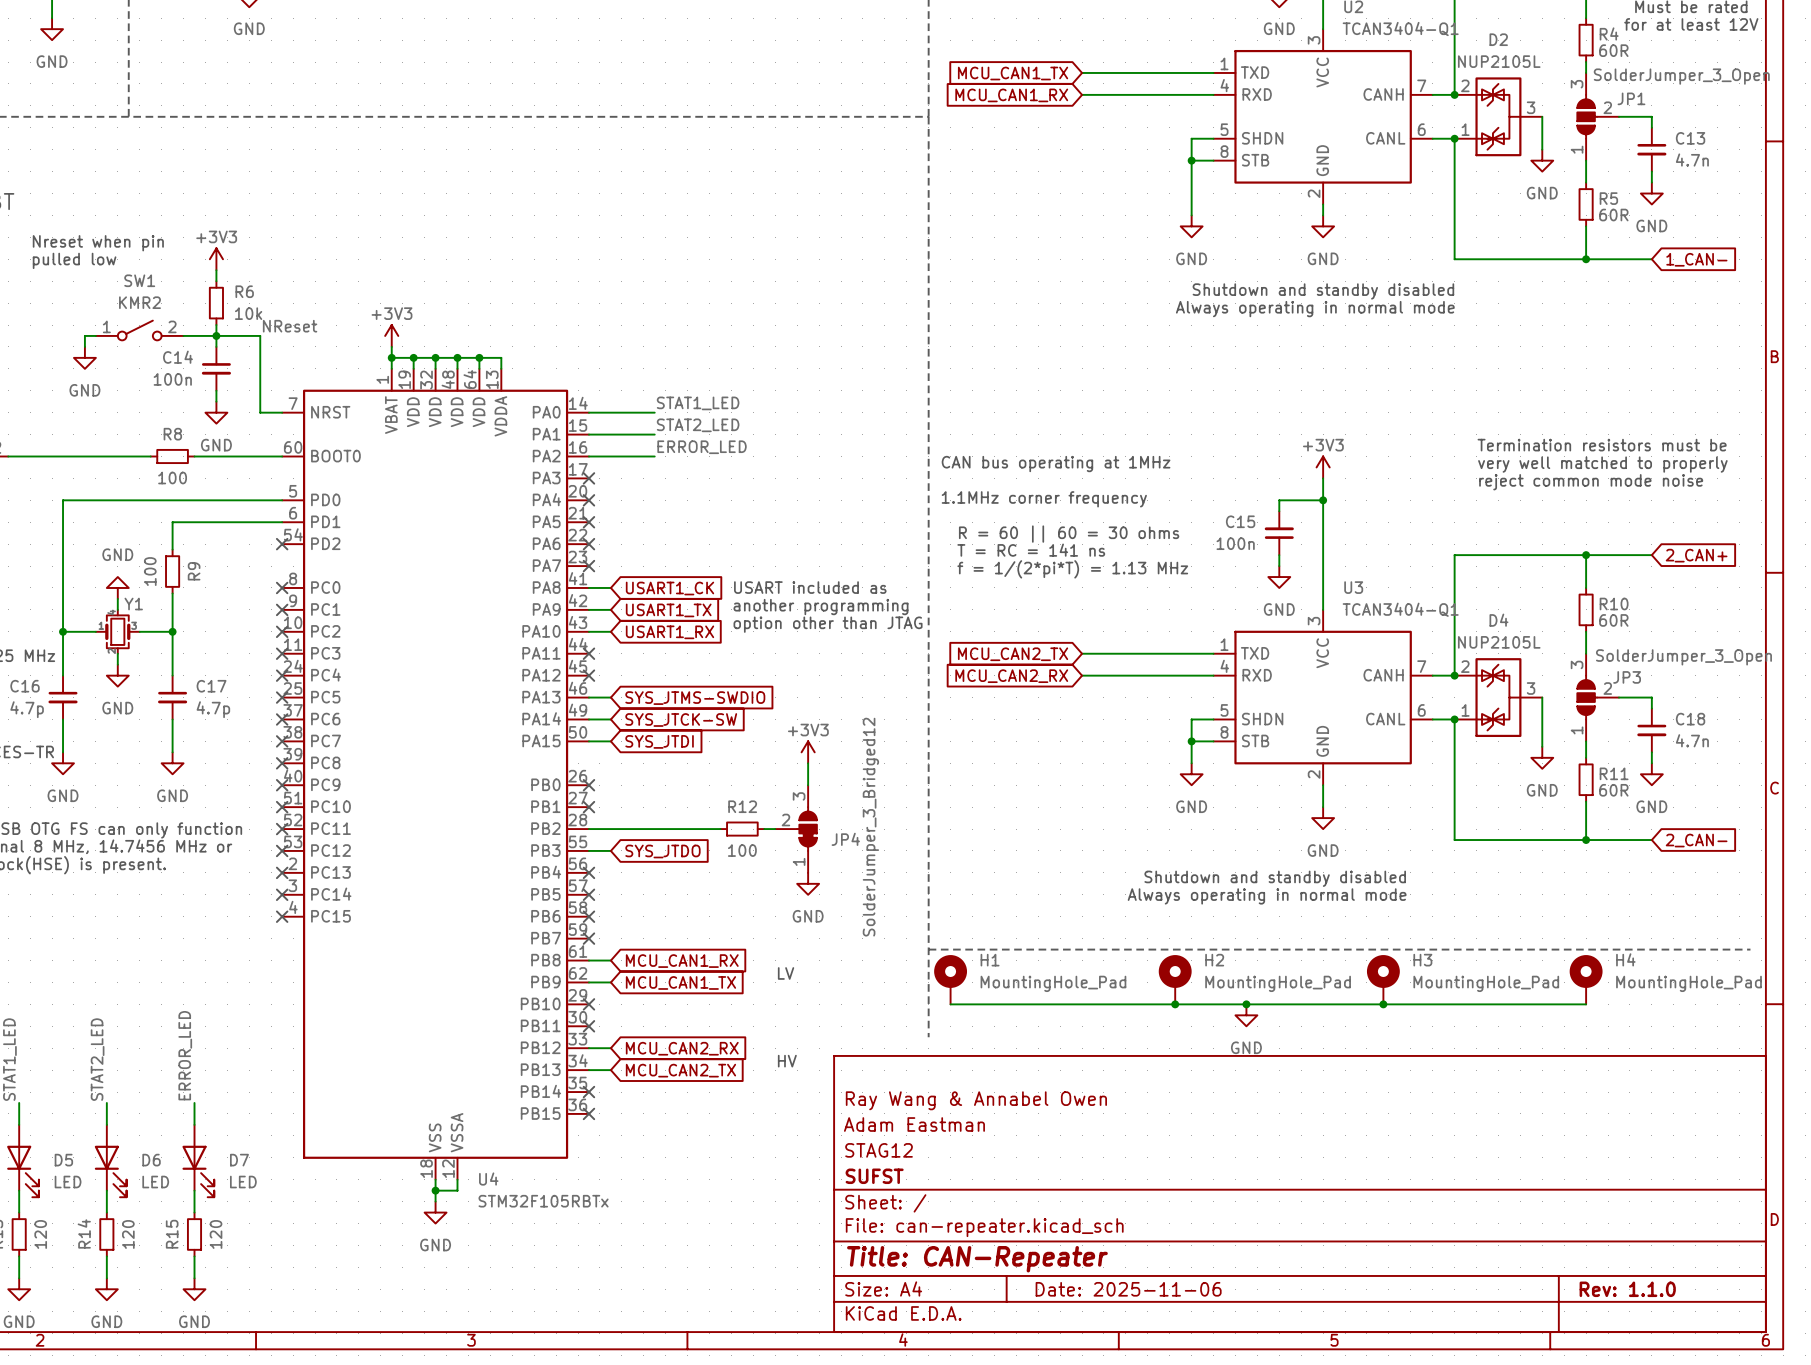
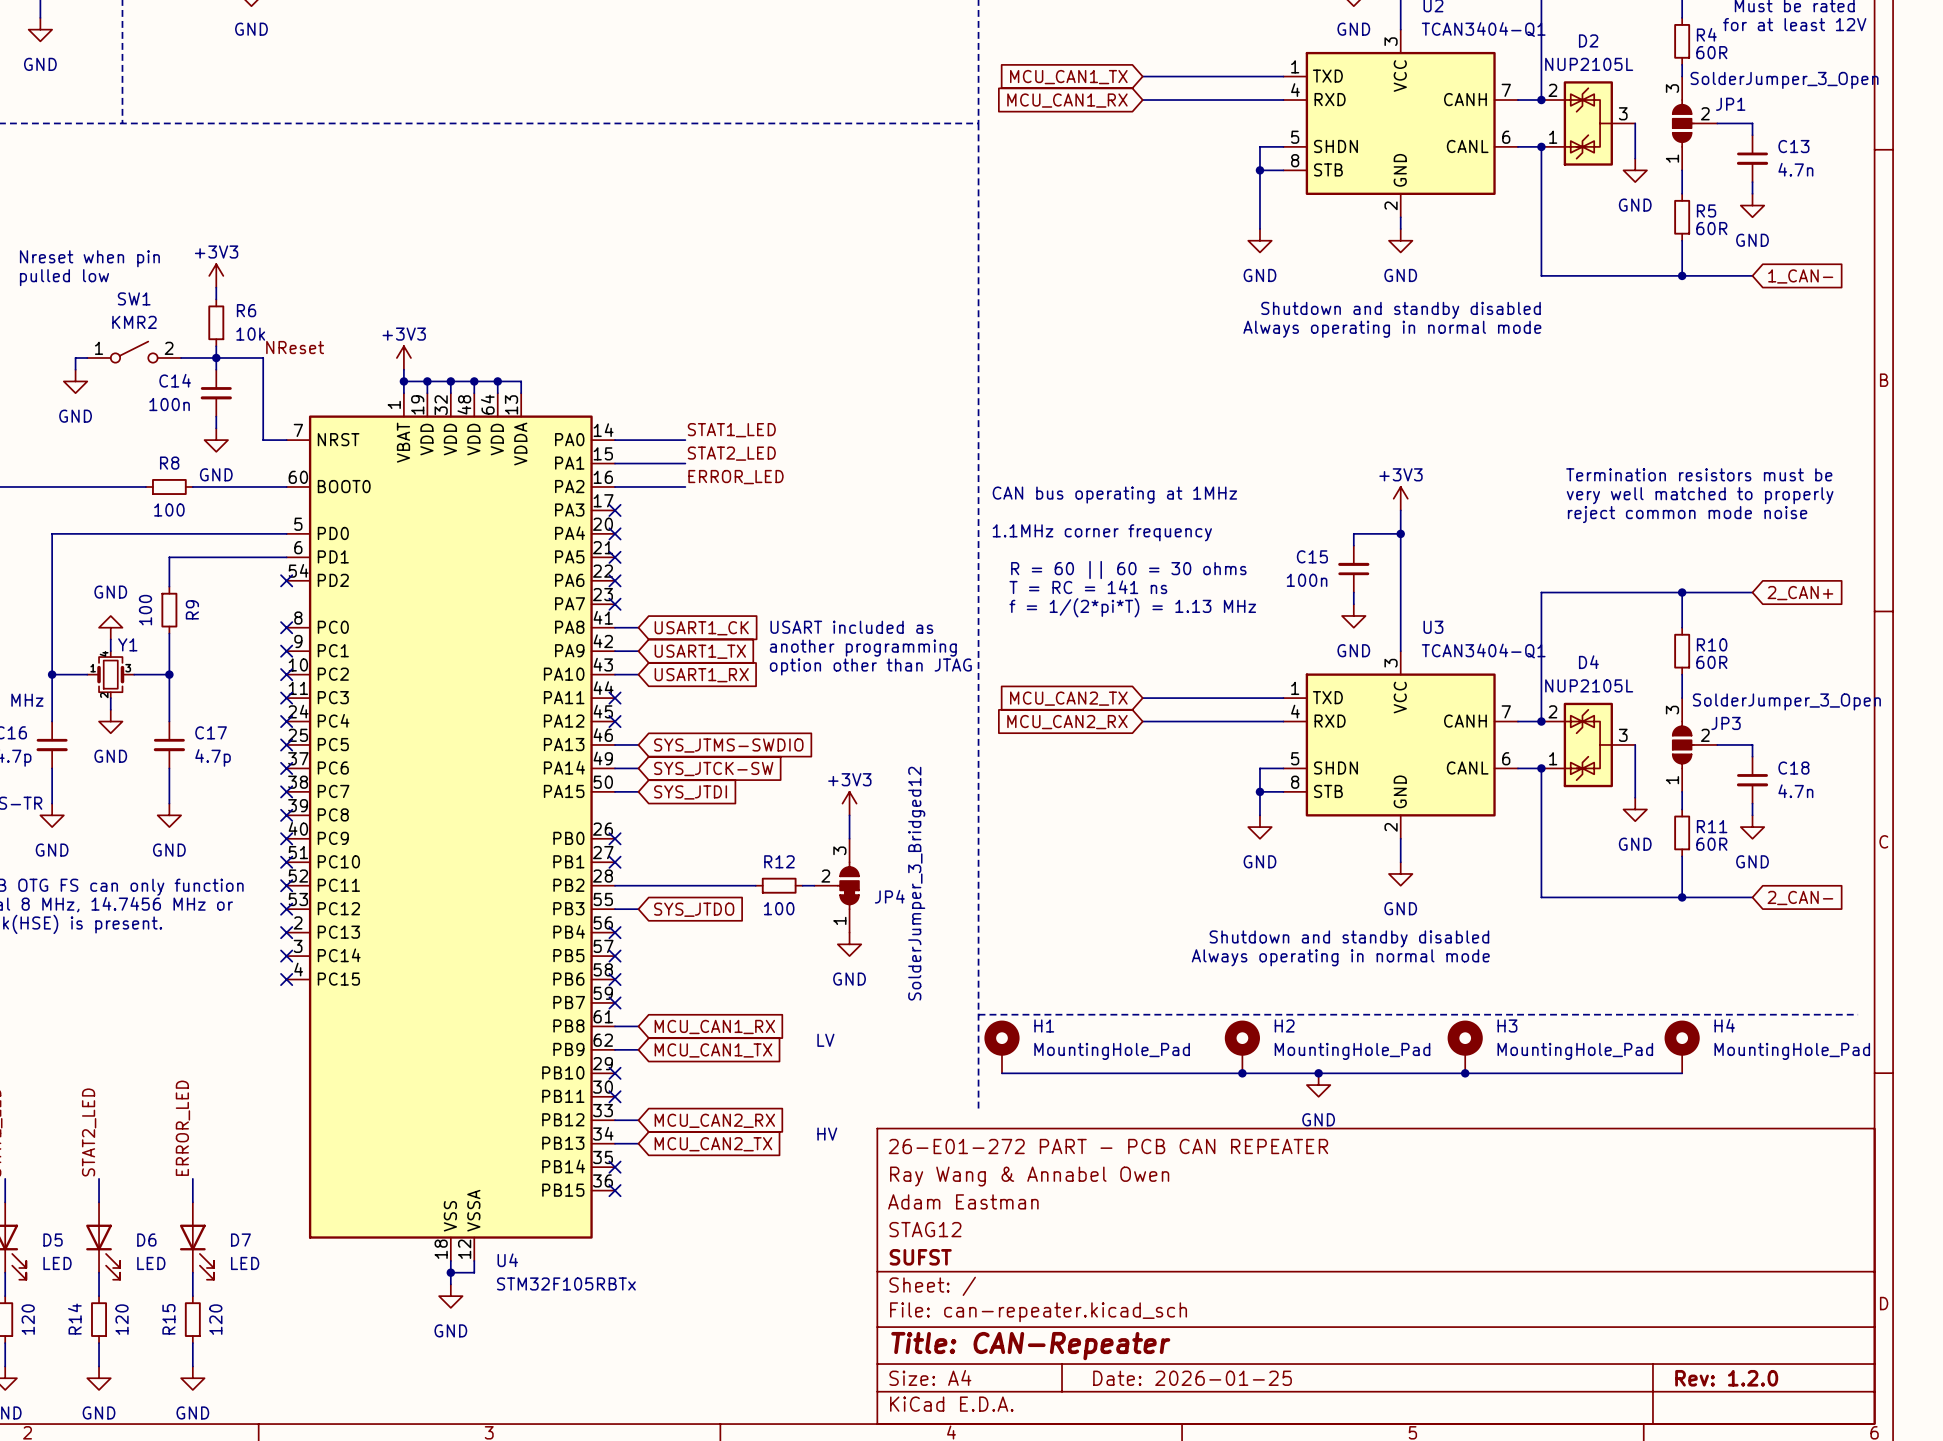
title block: none -> 26-E01-272 PART - PCB CAN REPEATER (1108, 1146)
title block: Date: 2025-11-06 (1128, 1289) -> Date: 2026-01-25 (1192, 1378)
title block: Rev: 1.1.0 (1627, 1289) -> Rev: 1.2.0 (1726, 1378)

